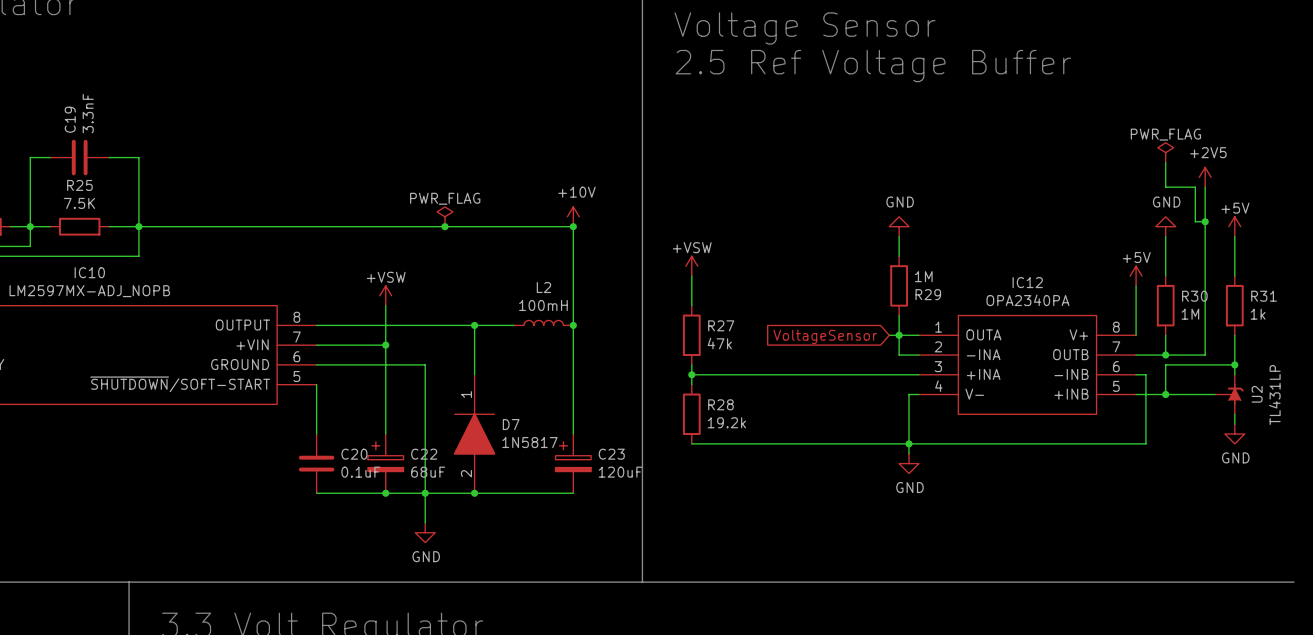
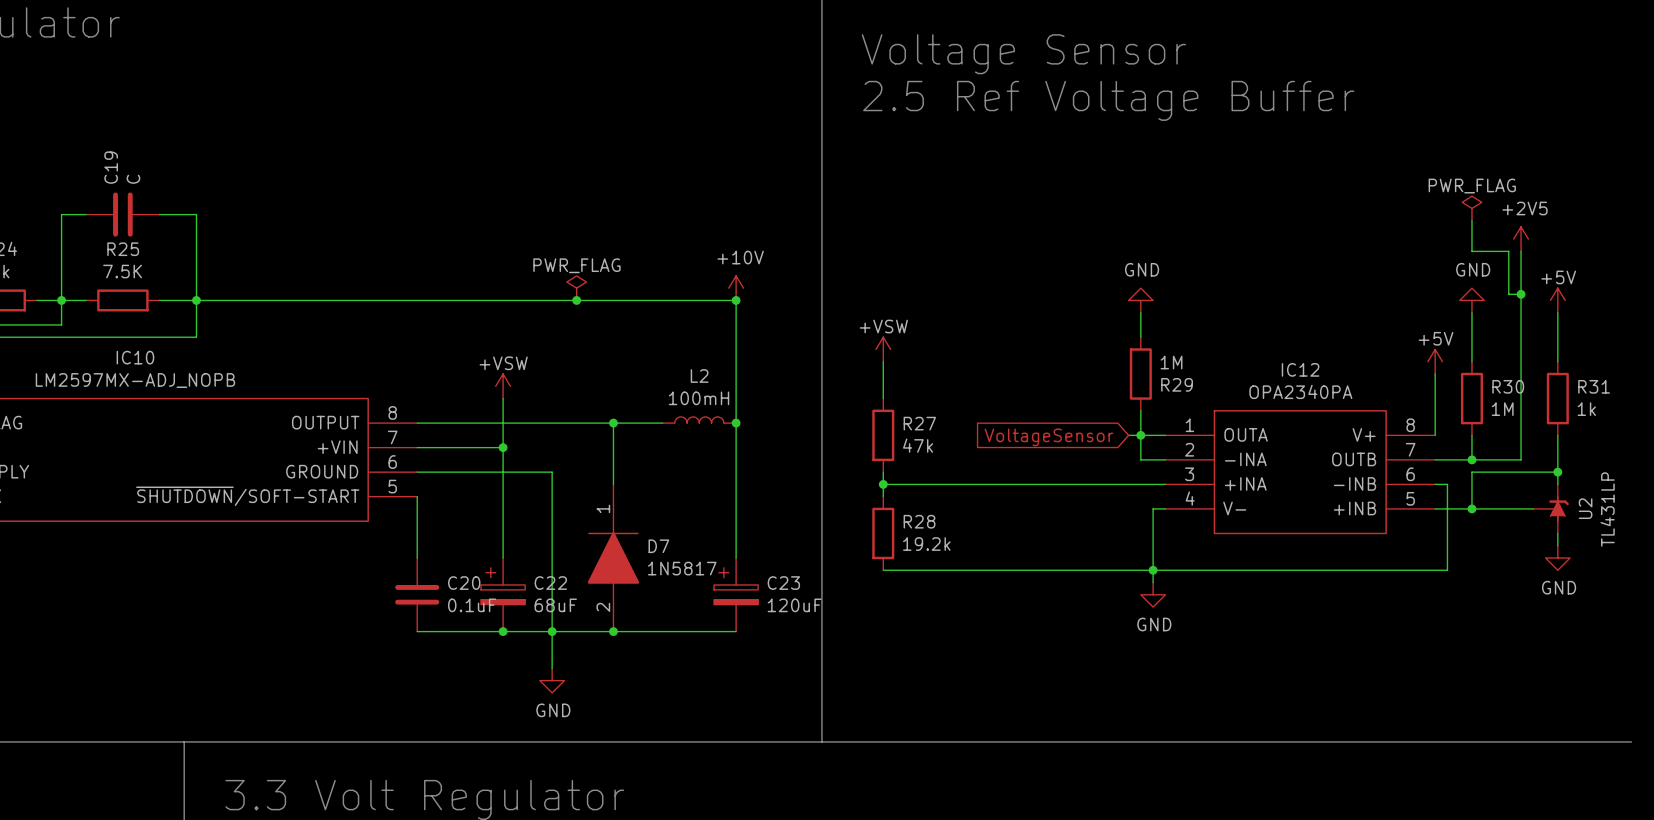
C19 value: 3.3nF (88, 113) -> C (133, 179)

